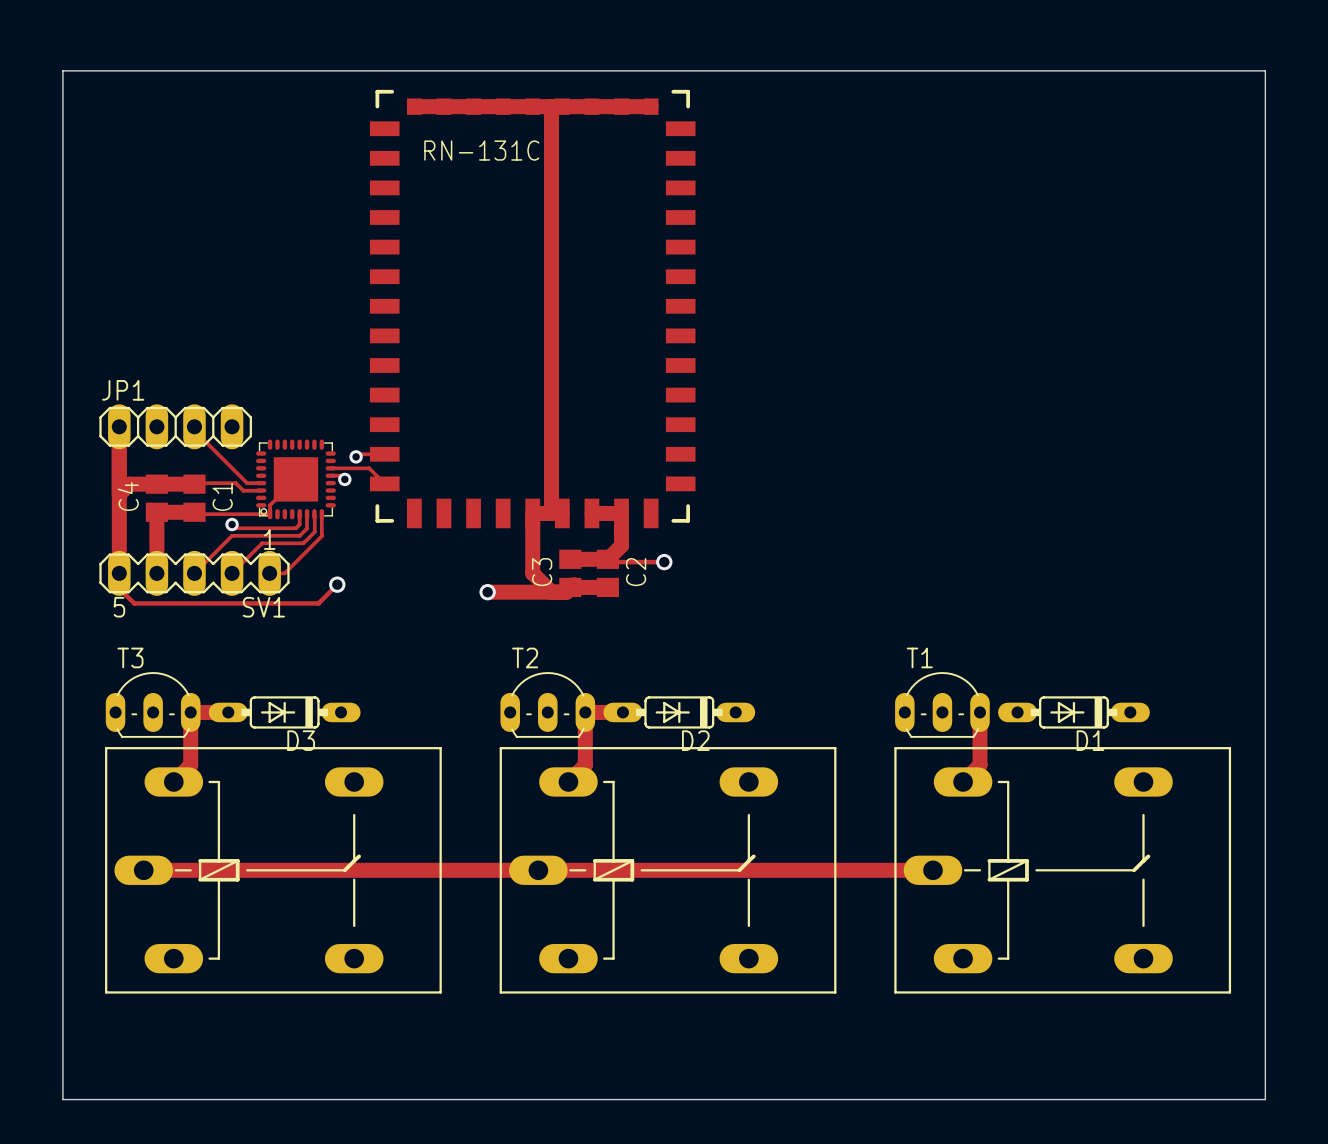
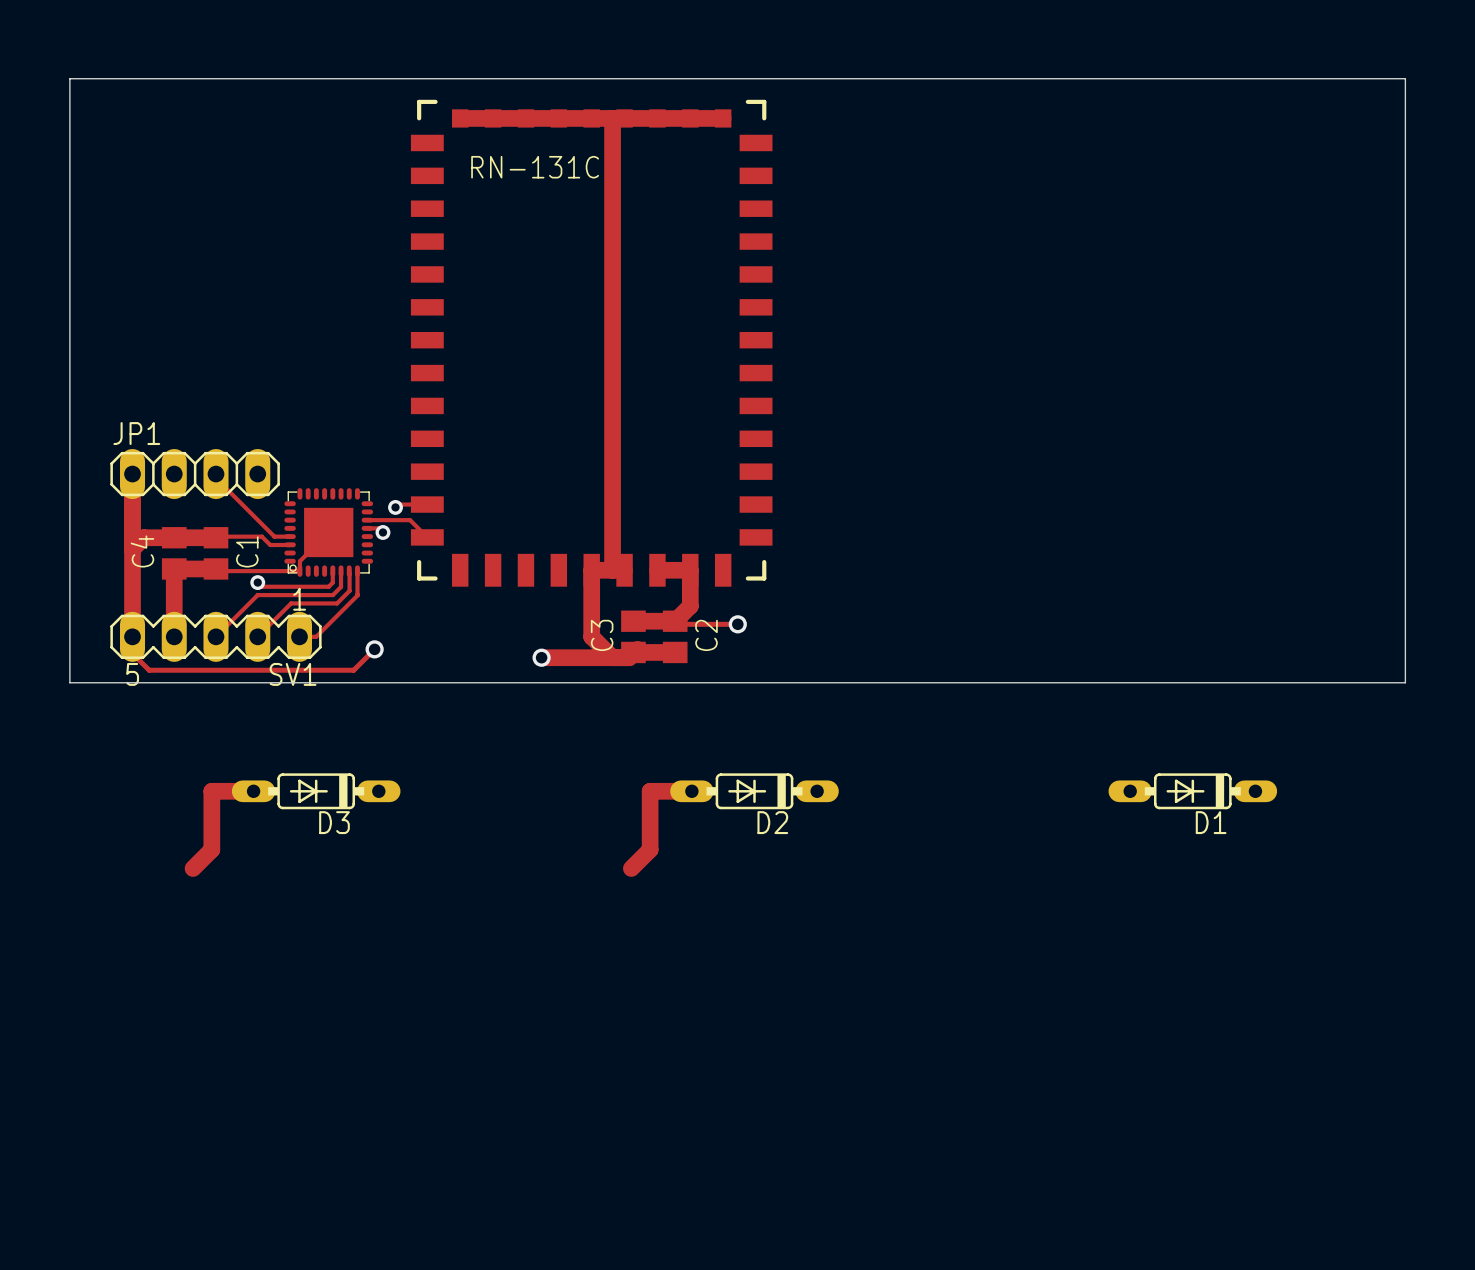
board edge: (62, 614) (62, 1099) (1265, 1099) (1265, 614) -> (69, 682) (1405, 682)
T3: (153, 704) -> none
T2: (547, 704) -> none
T1: (942, 704) -> none
track: (980, 712) (980, 765) (963, 781) -> none
track: (143, 870) (933, 870) -> none
part: (273, 870) -> none
part: (668, 870) -> none
part: (1062, 870) -> none

